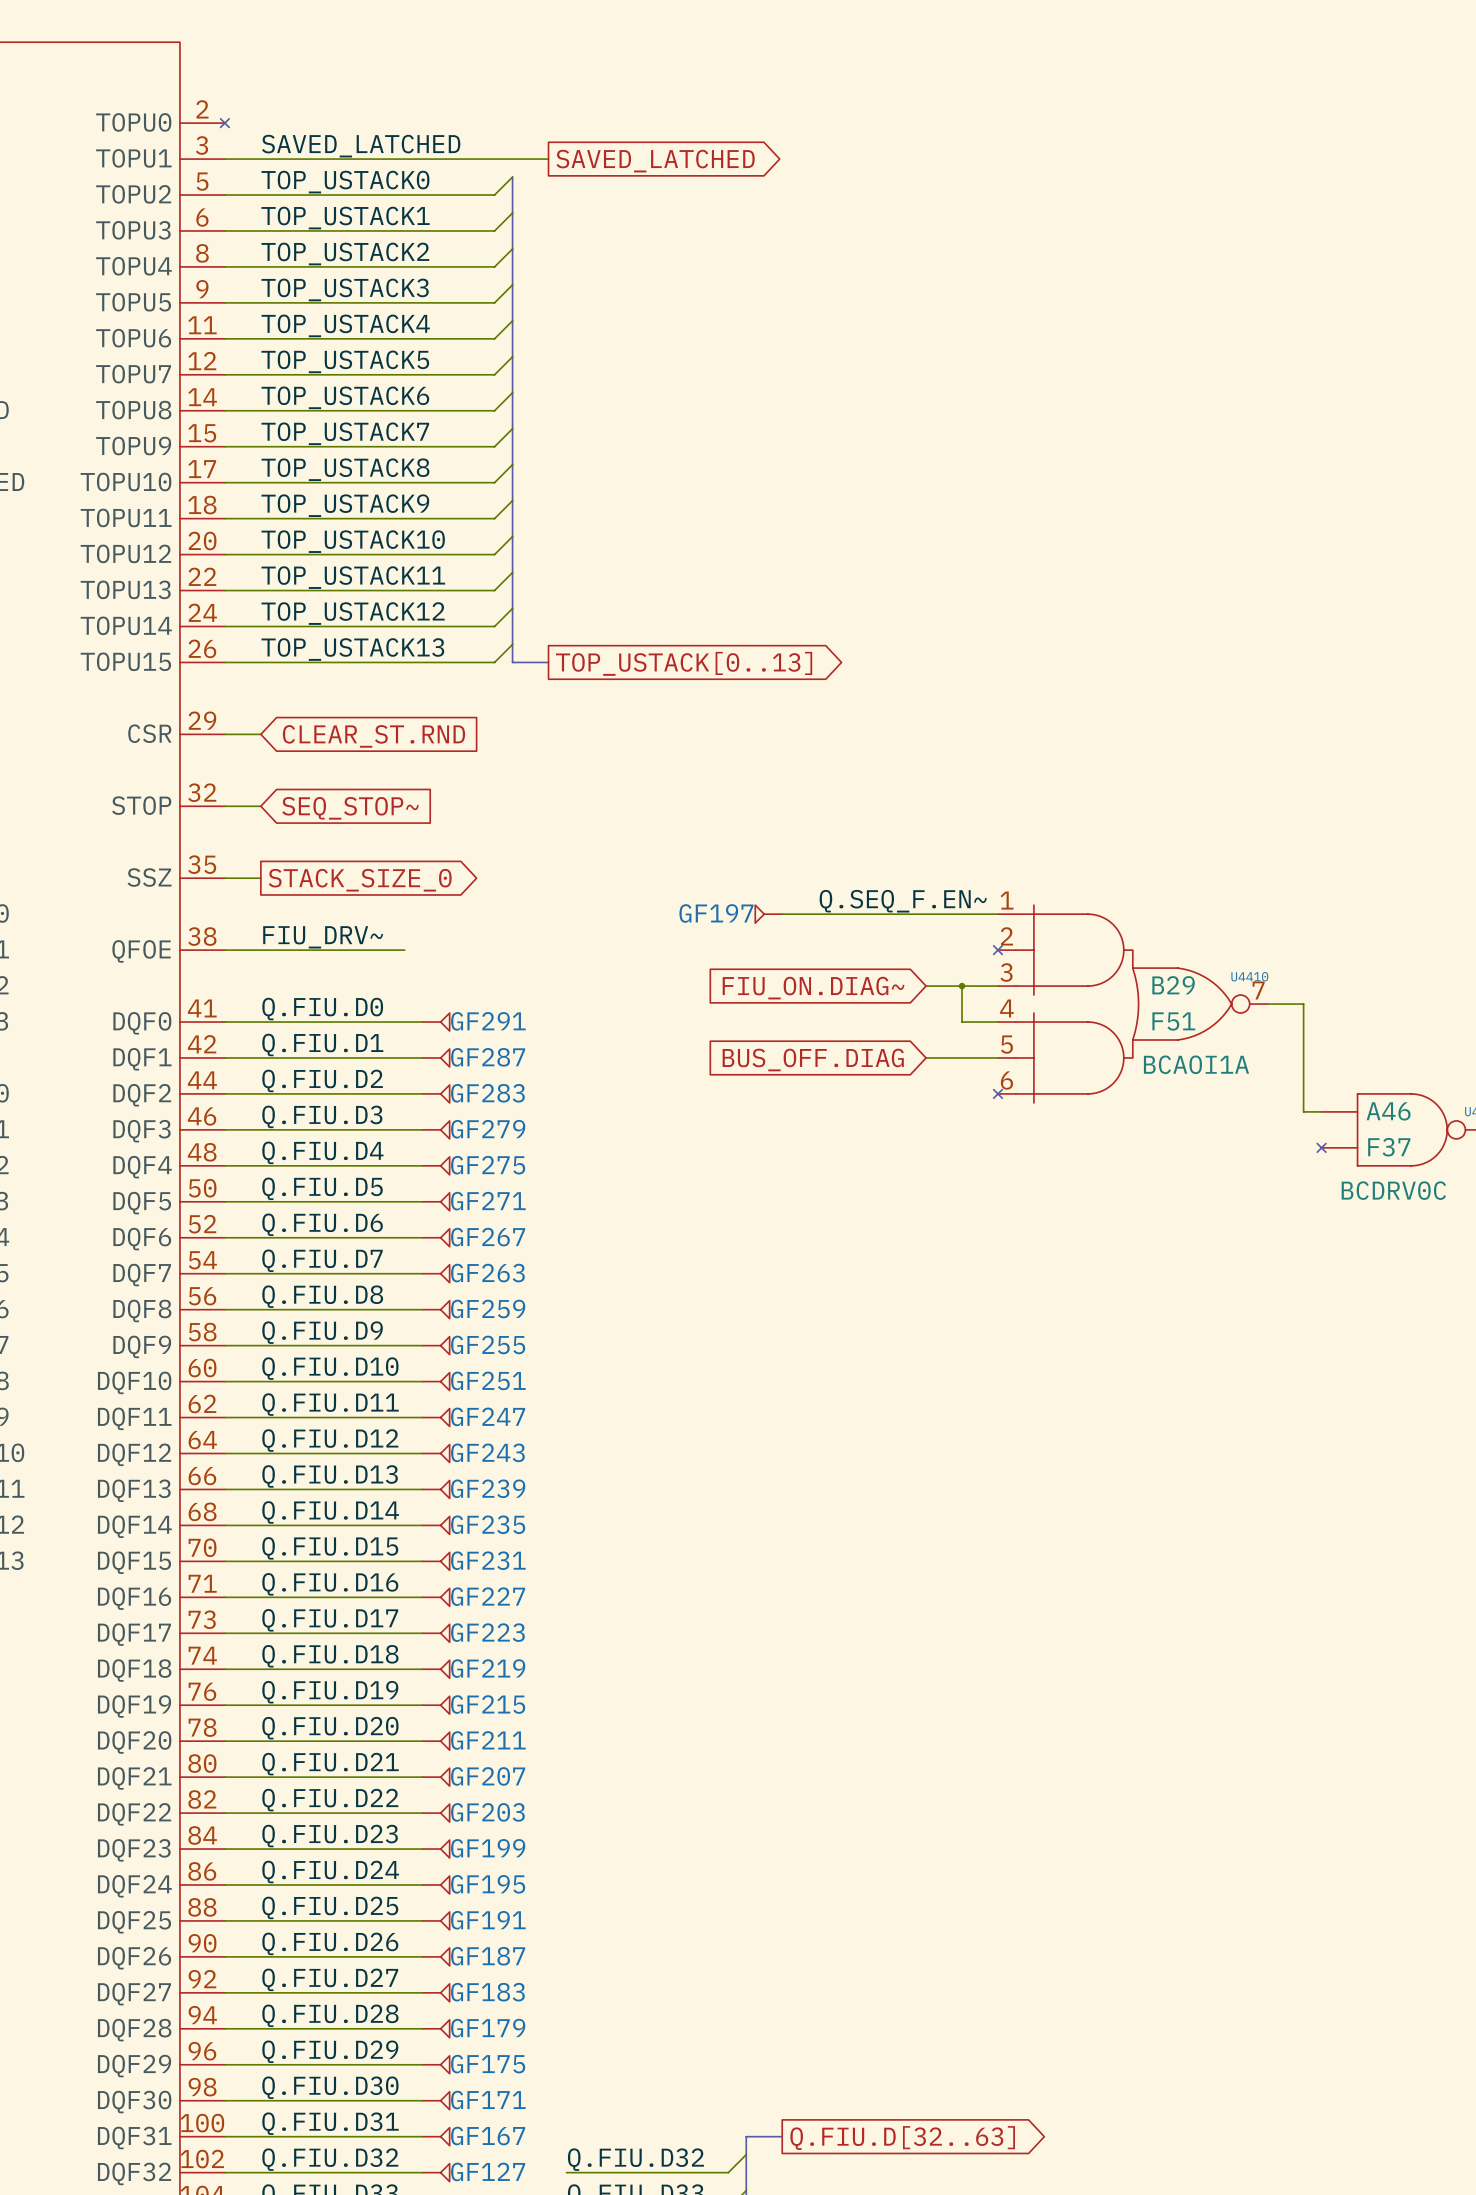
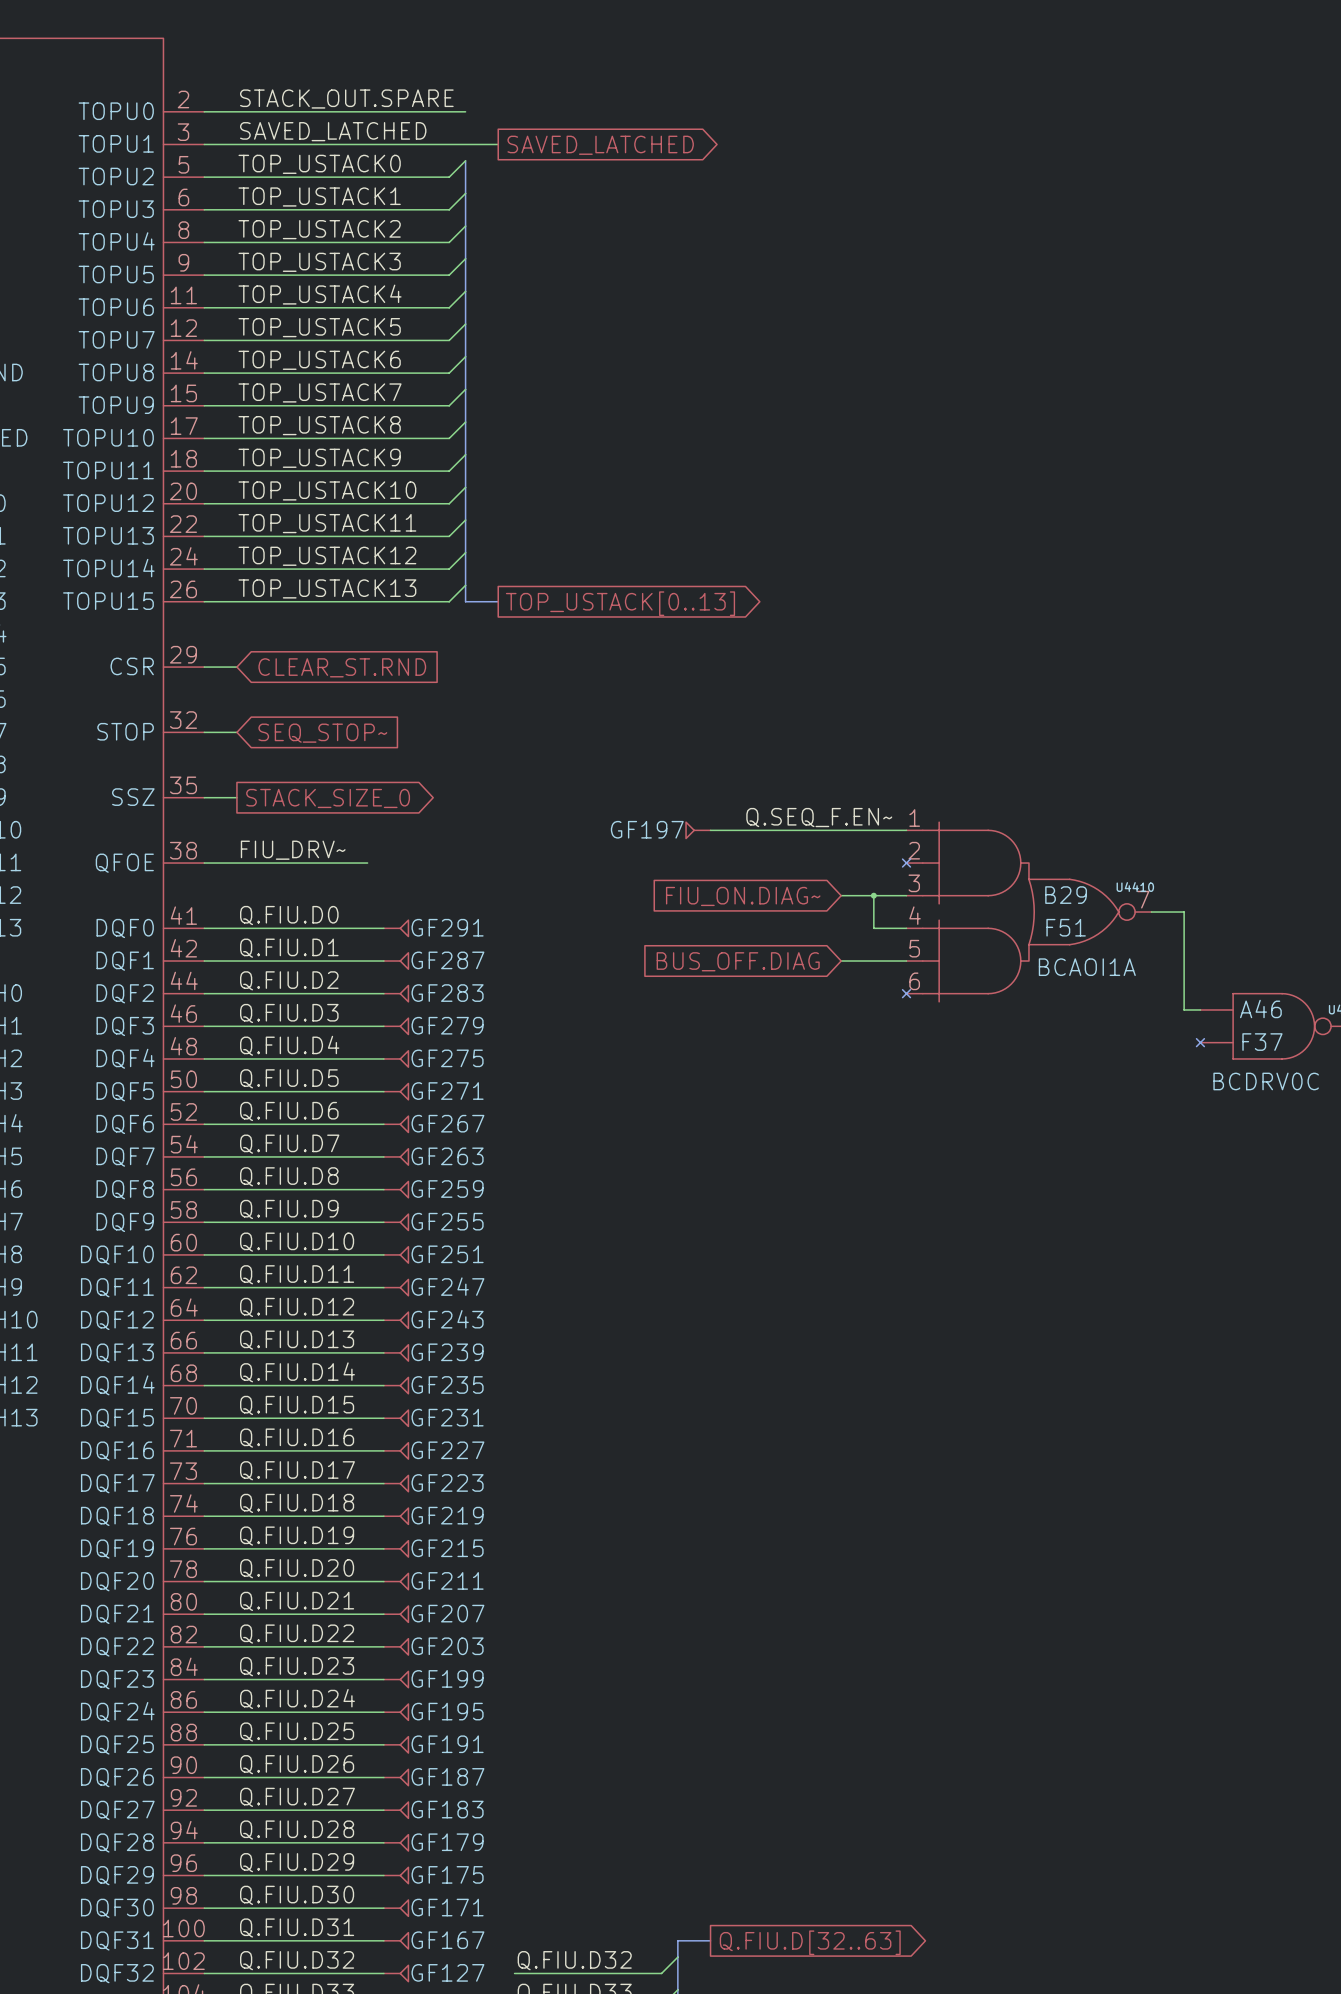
label: none -> STACK_OUT.SPARE (346, 99)
wire: none -> (204, 111) (465, 111)
no-connect mark: (224, 123) -> none

